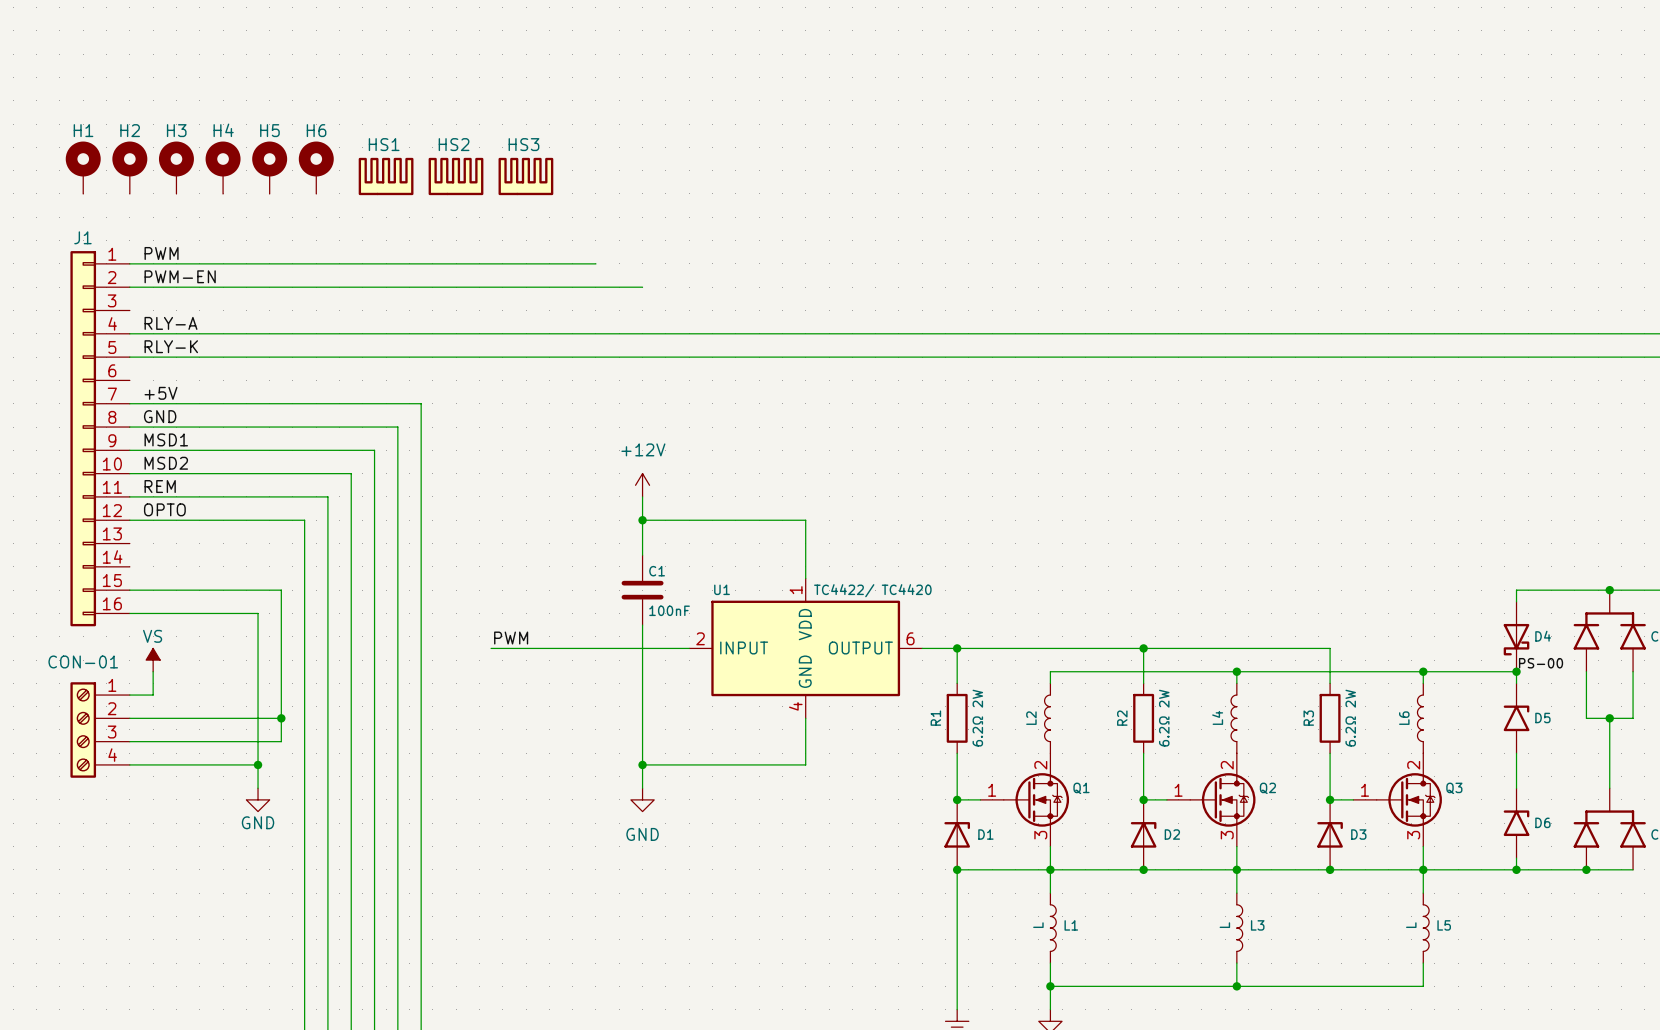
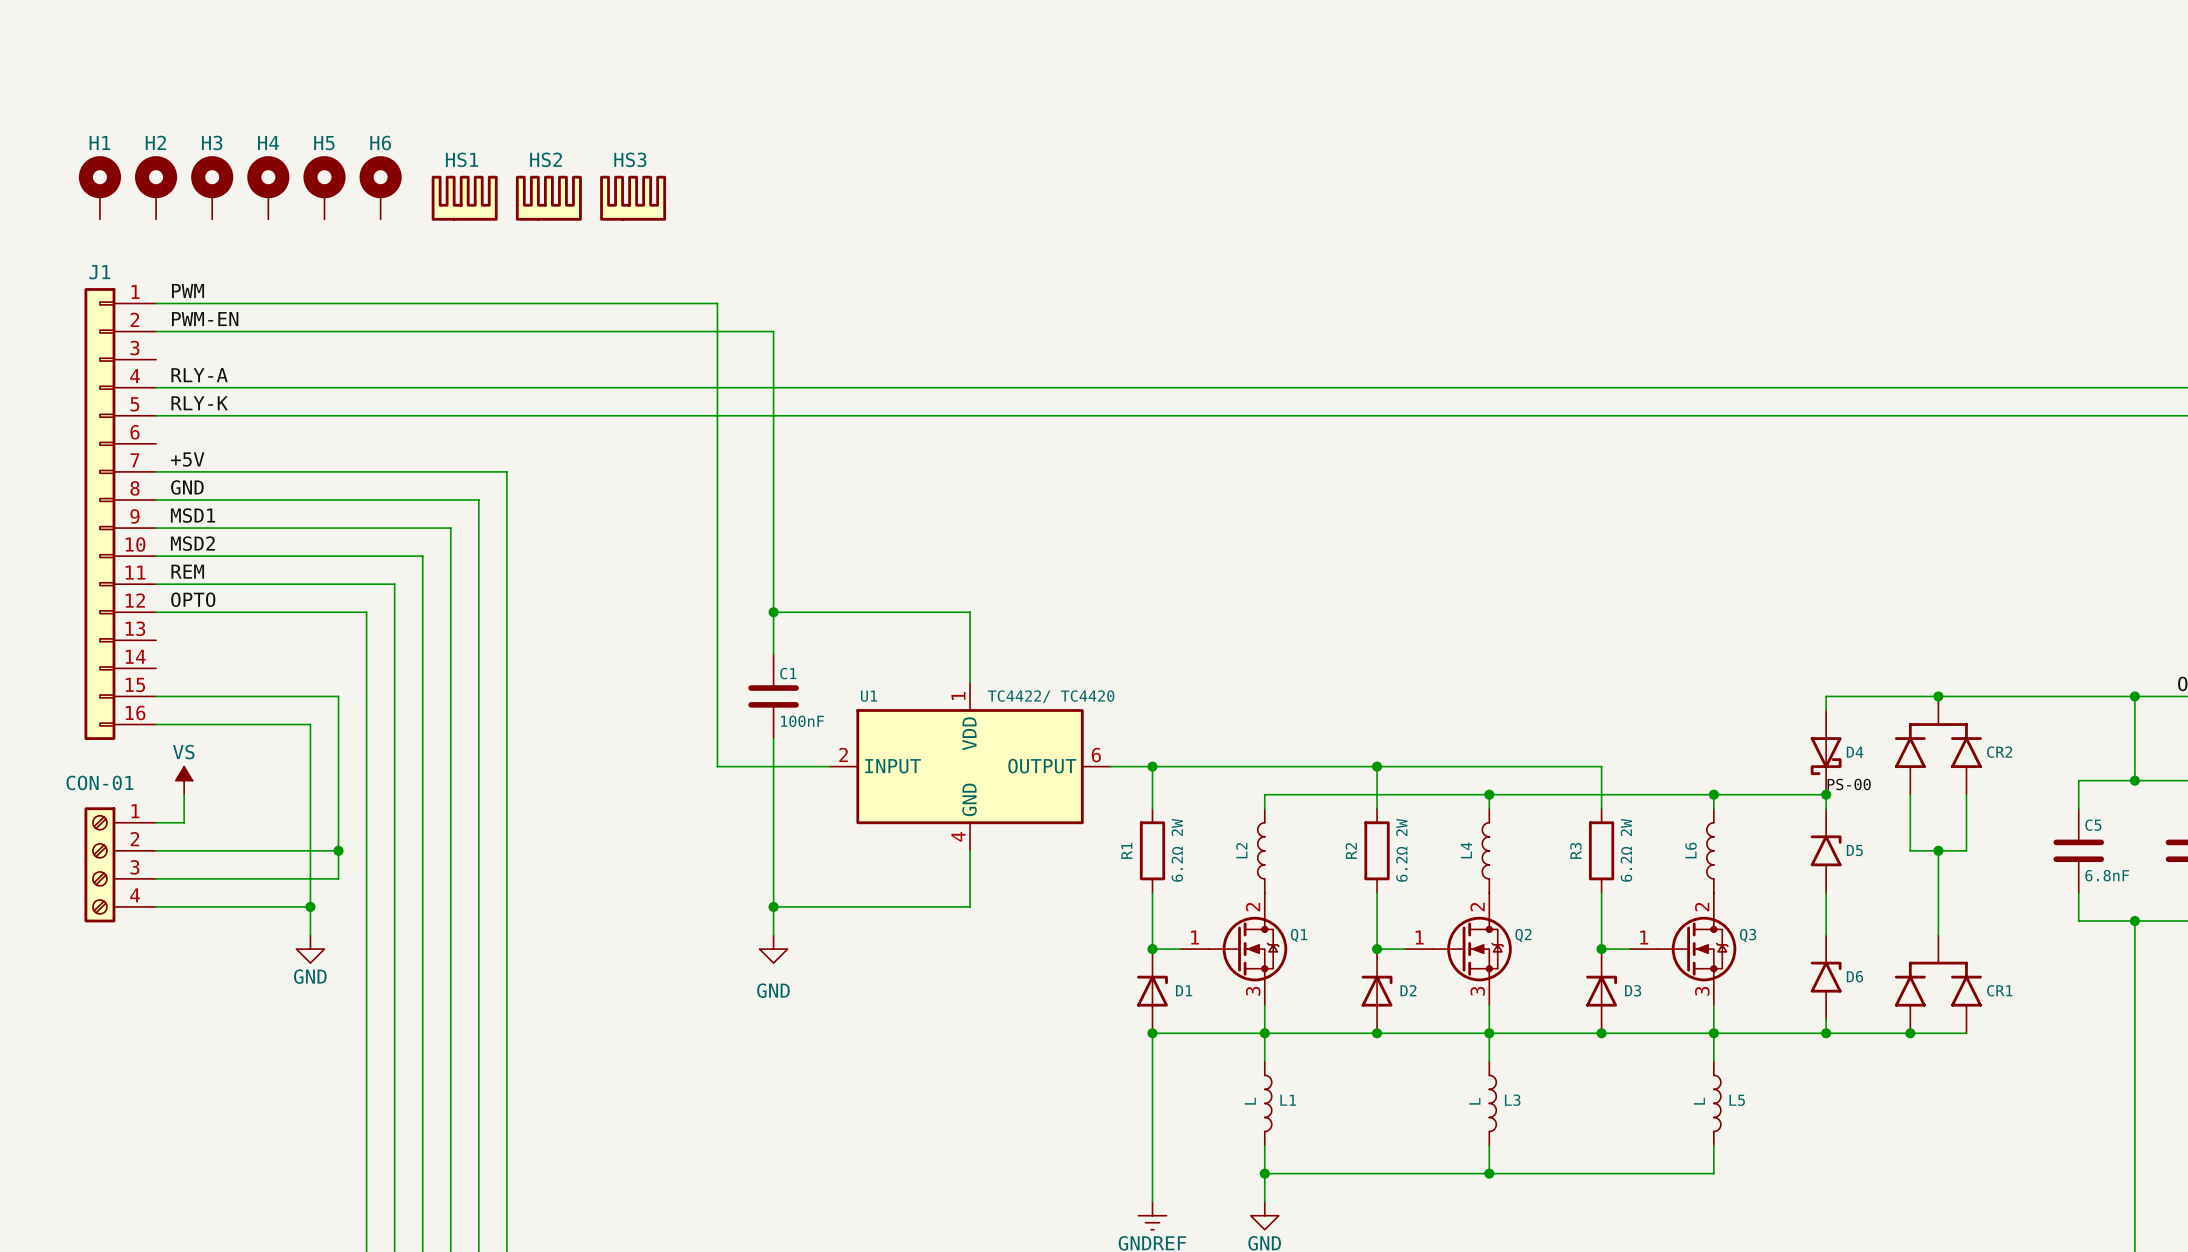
wire: none -> (773, 331) (773, 584)
power symbol: +12V (642, 485) -> none
label: PWM (511, 638) -> none
wire: (491, 648) (595, 648) -> (717, 303) (717, 766)

